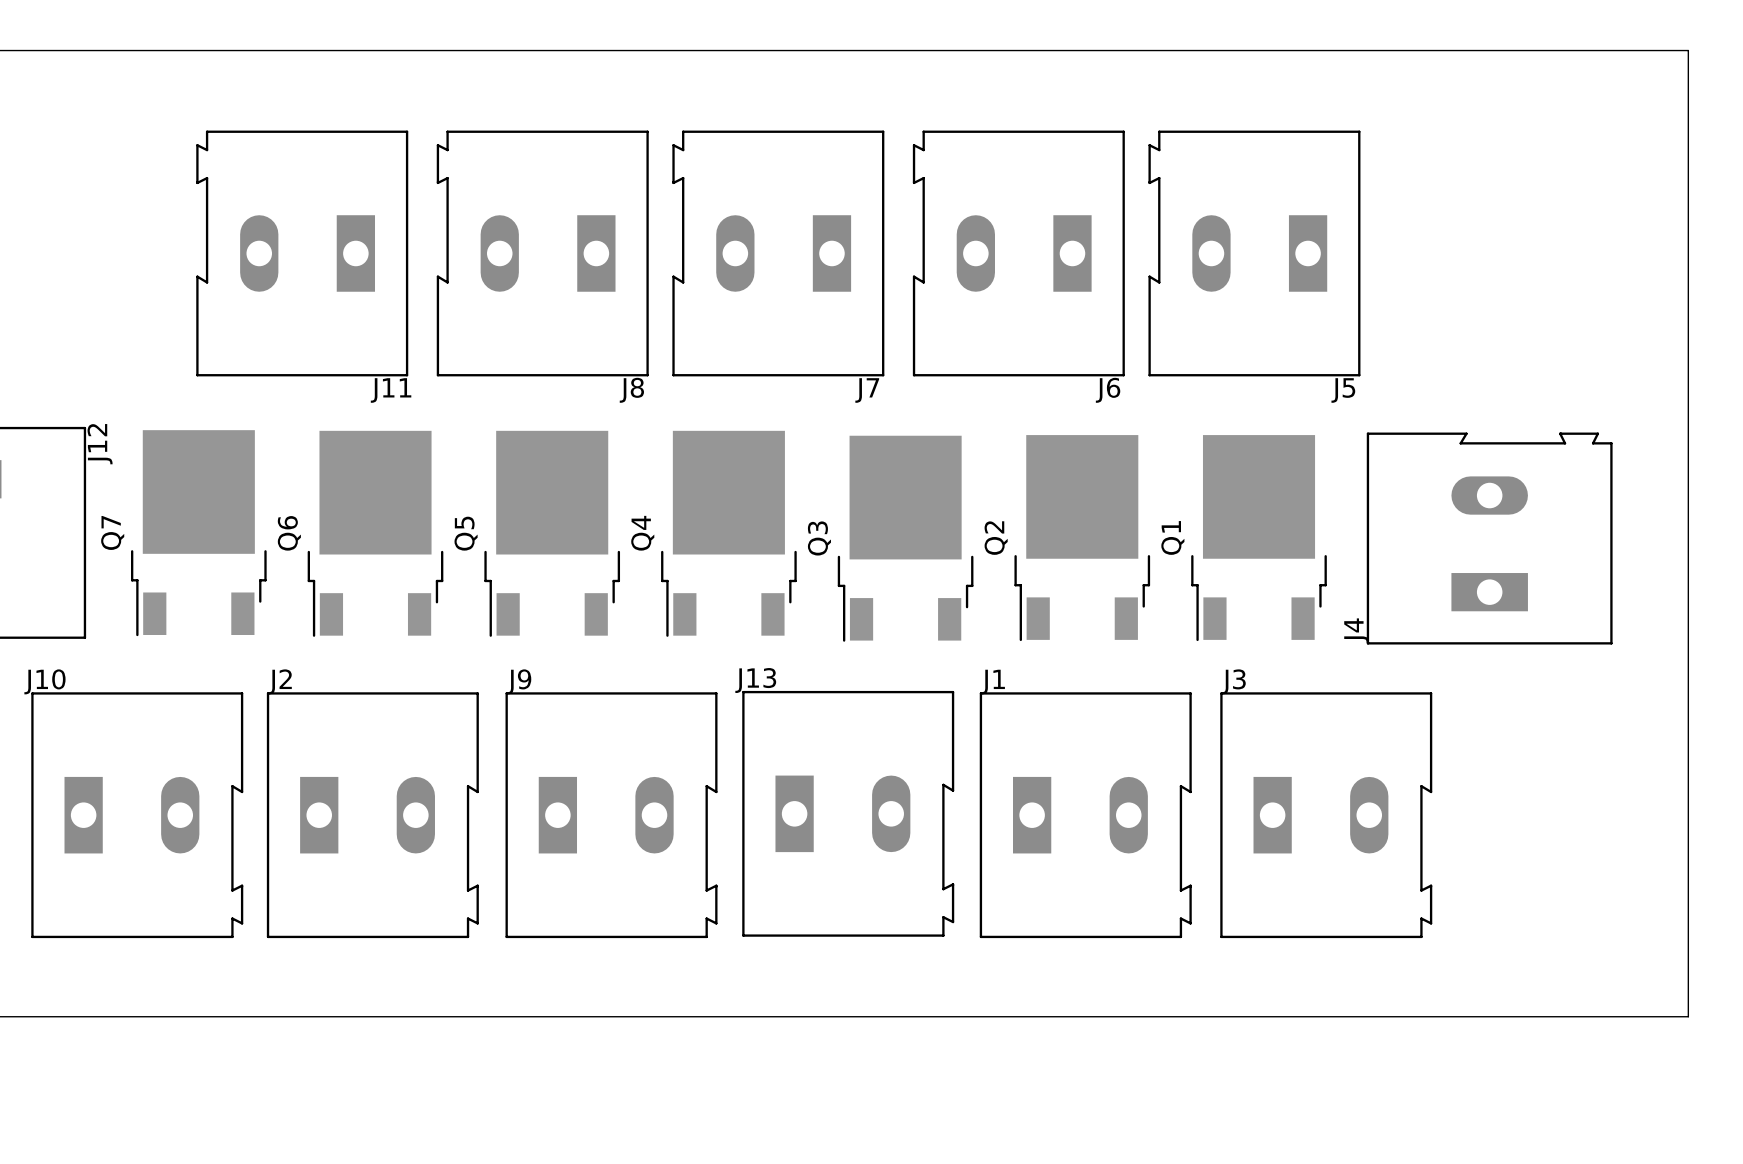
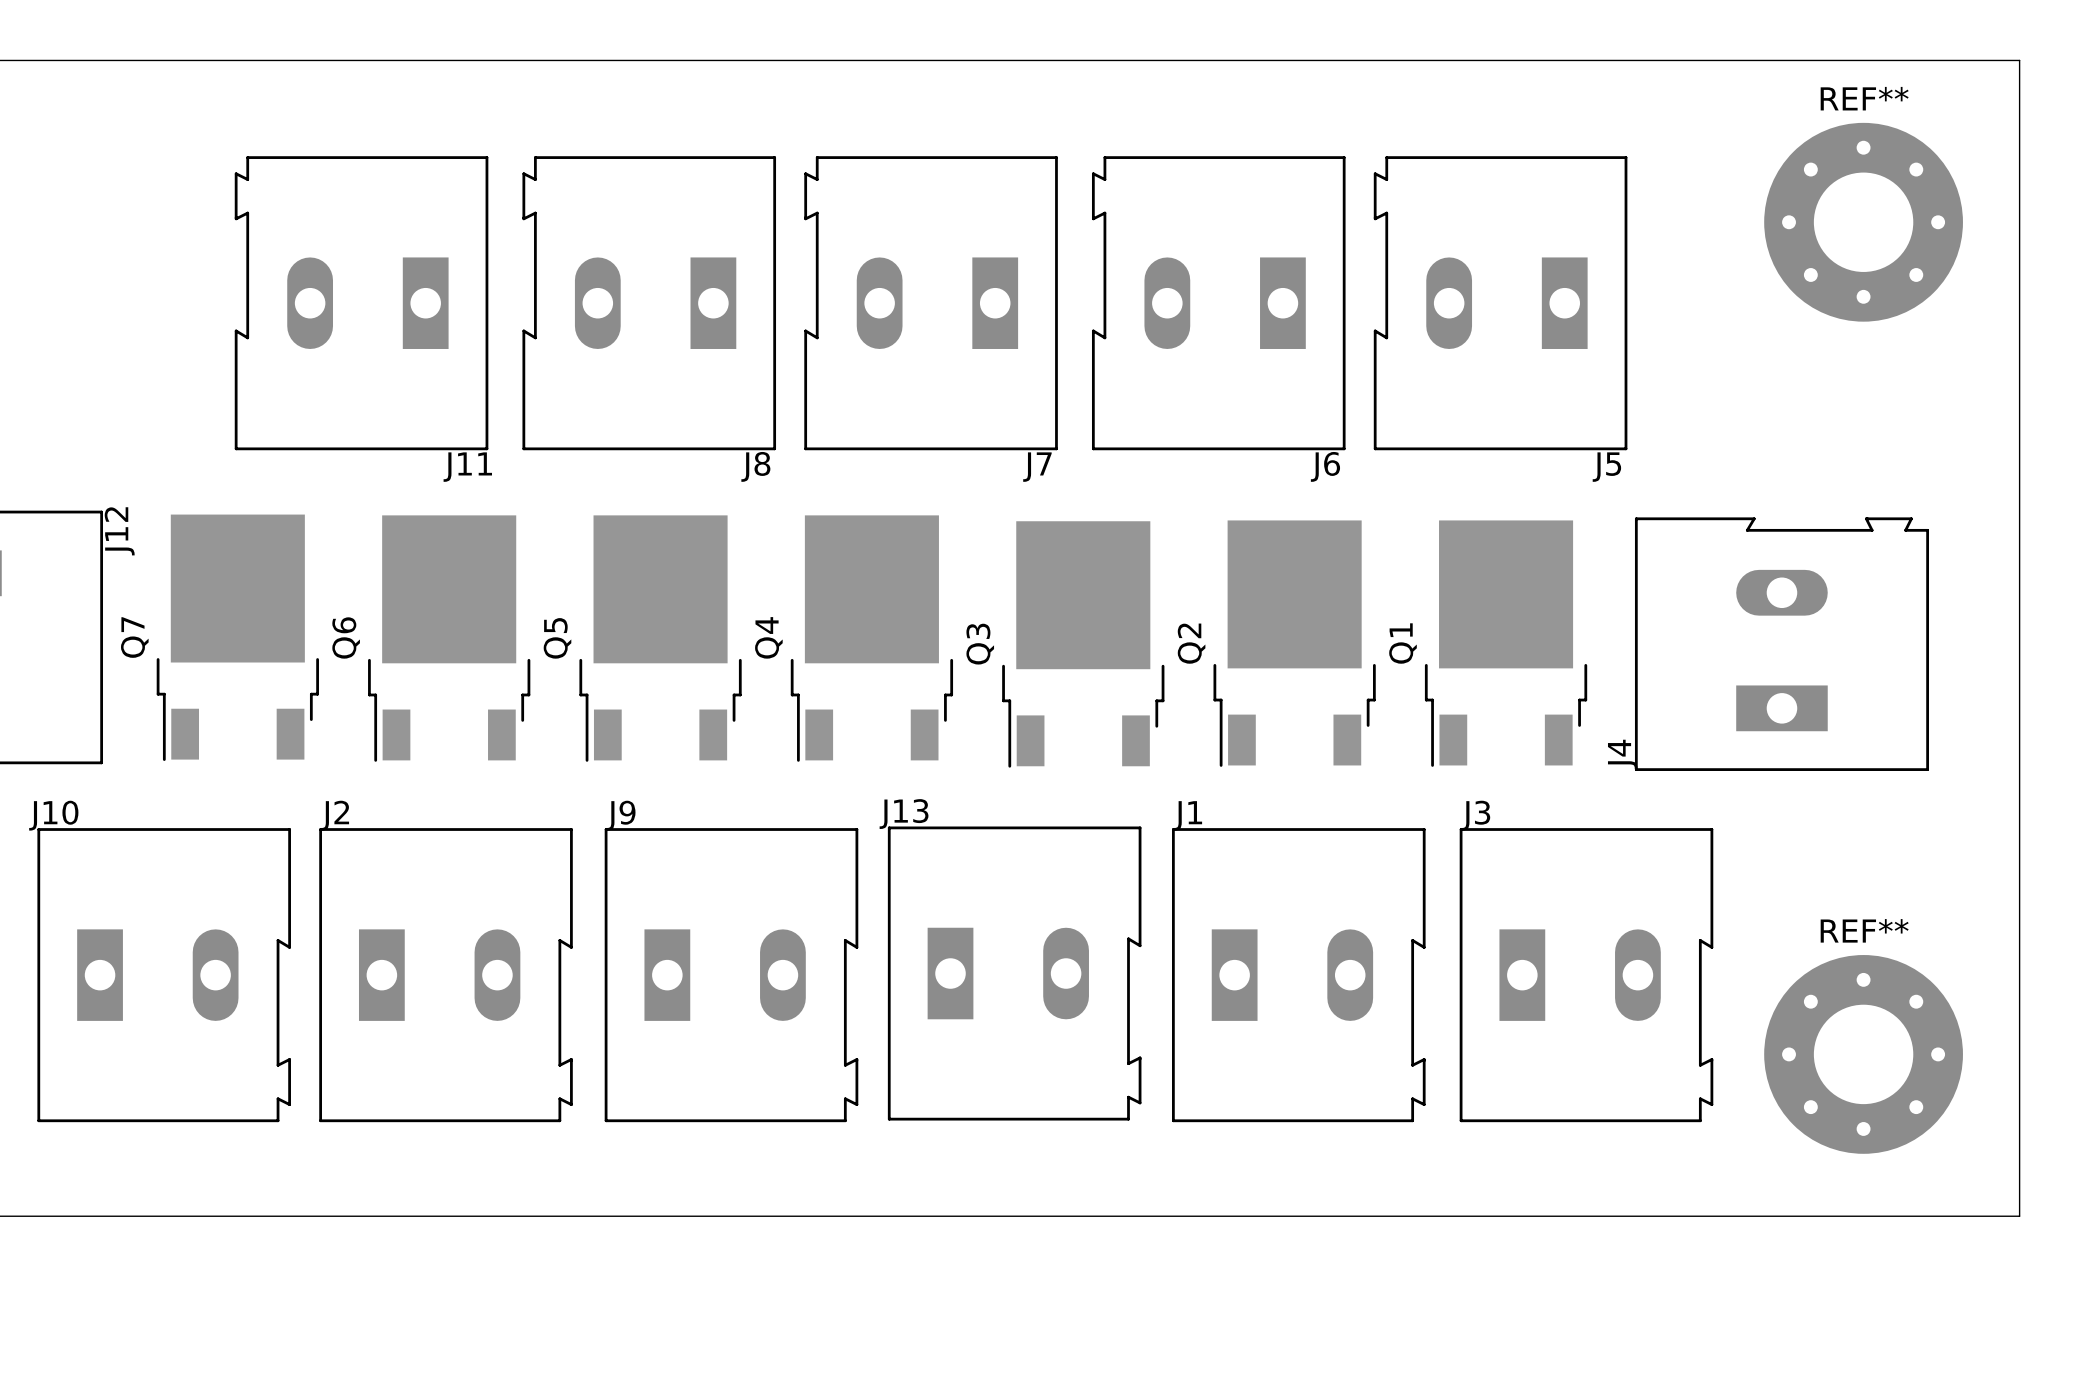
REF**: none -> (1863, 222)
REF**: none -> (1863, 1054)

